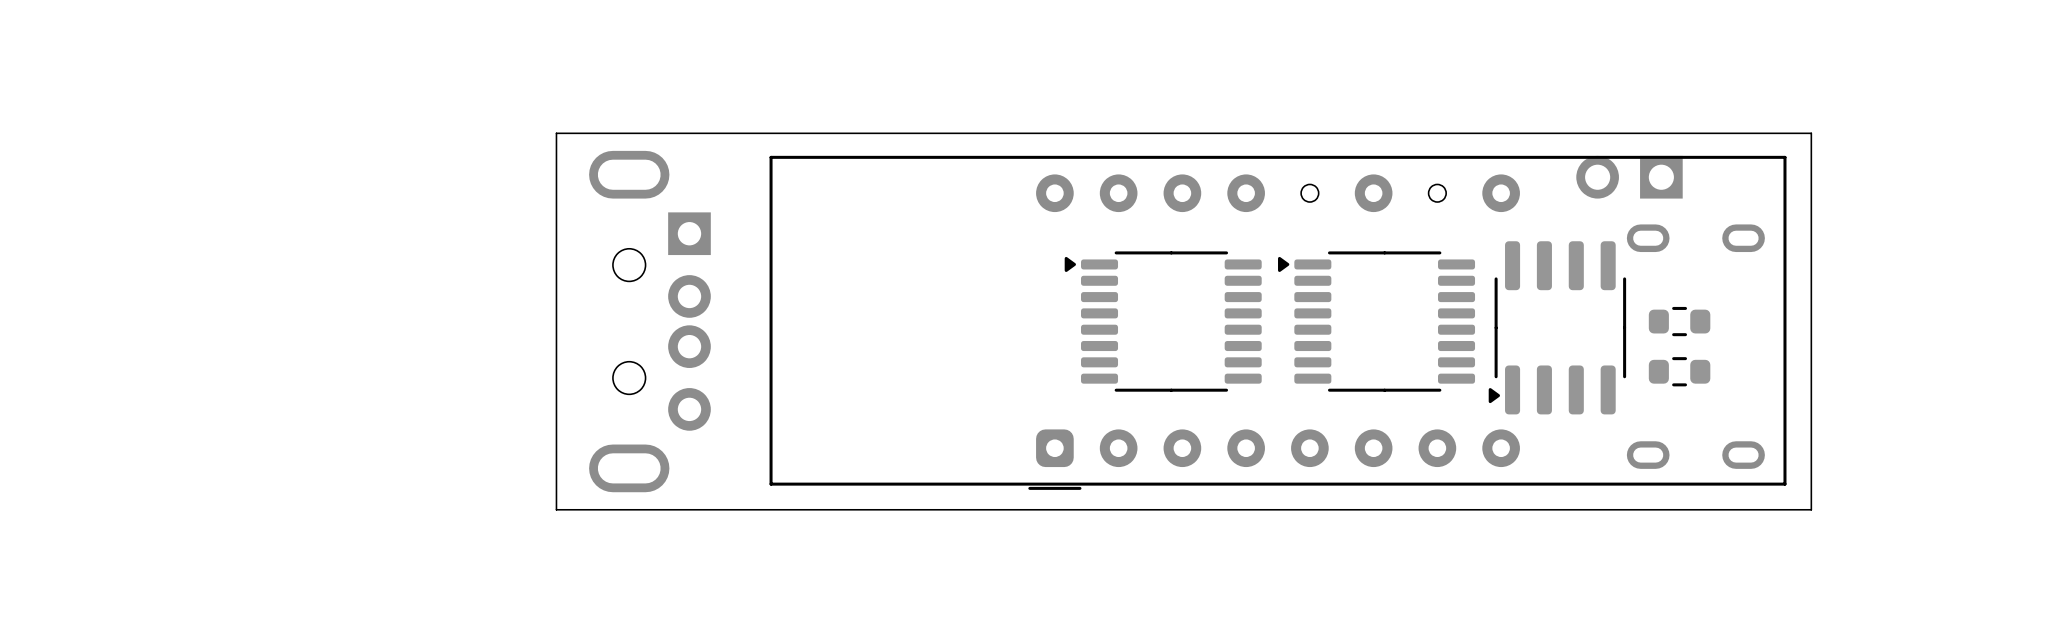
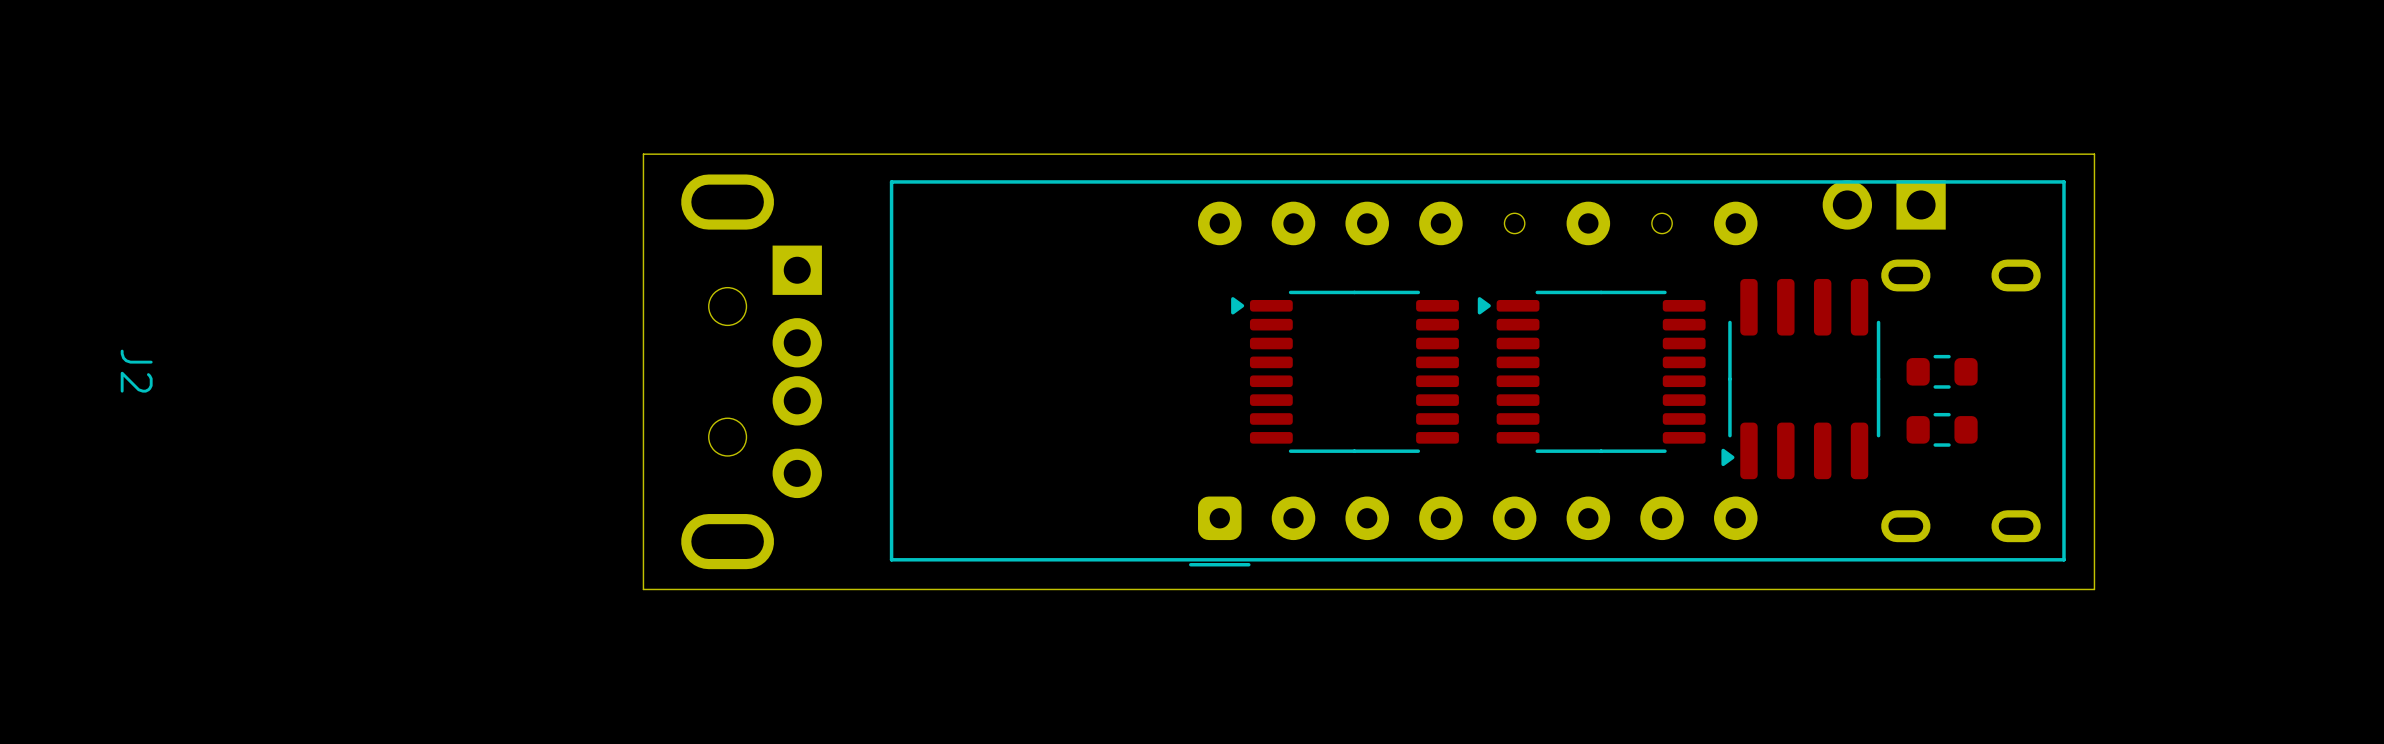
J2 name: none -> J2 (136, 371)

